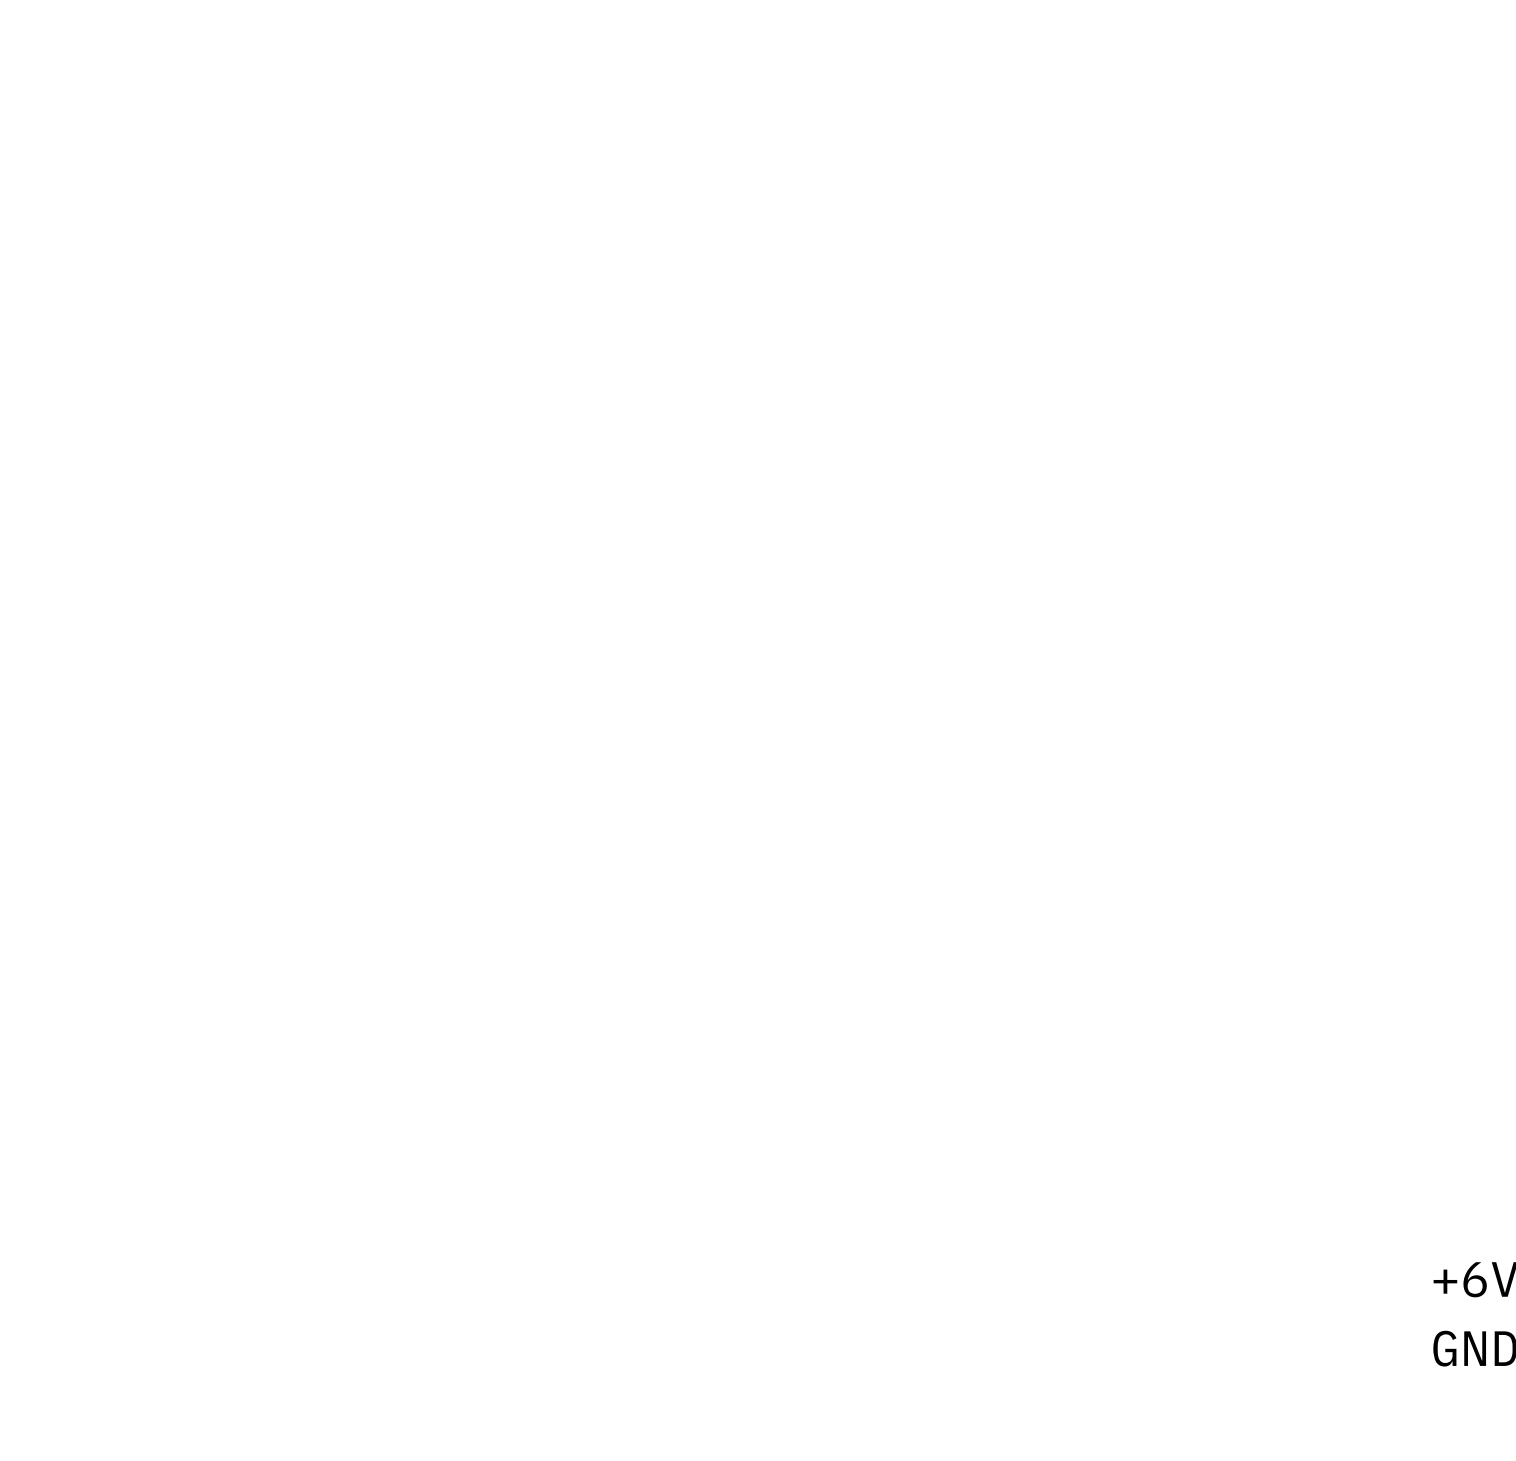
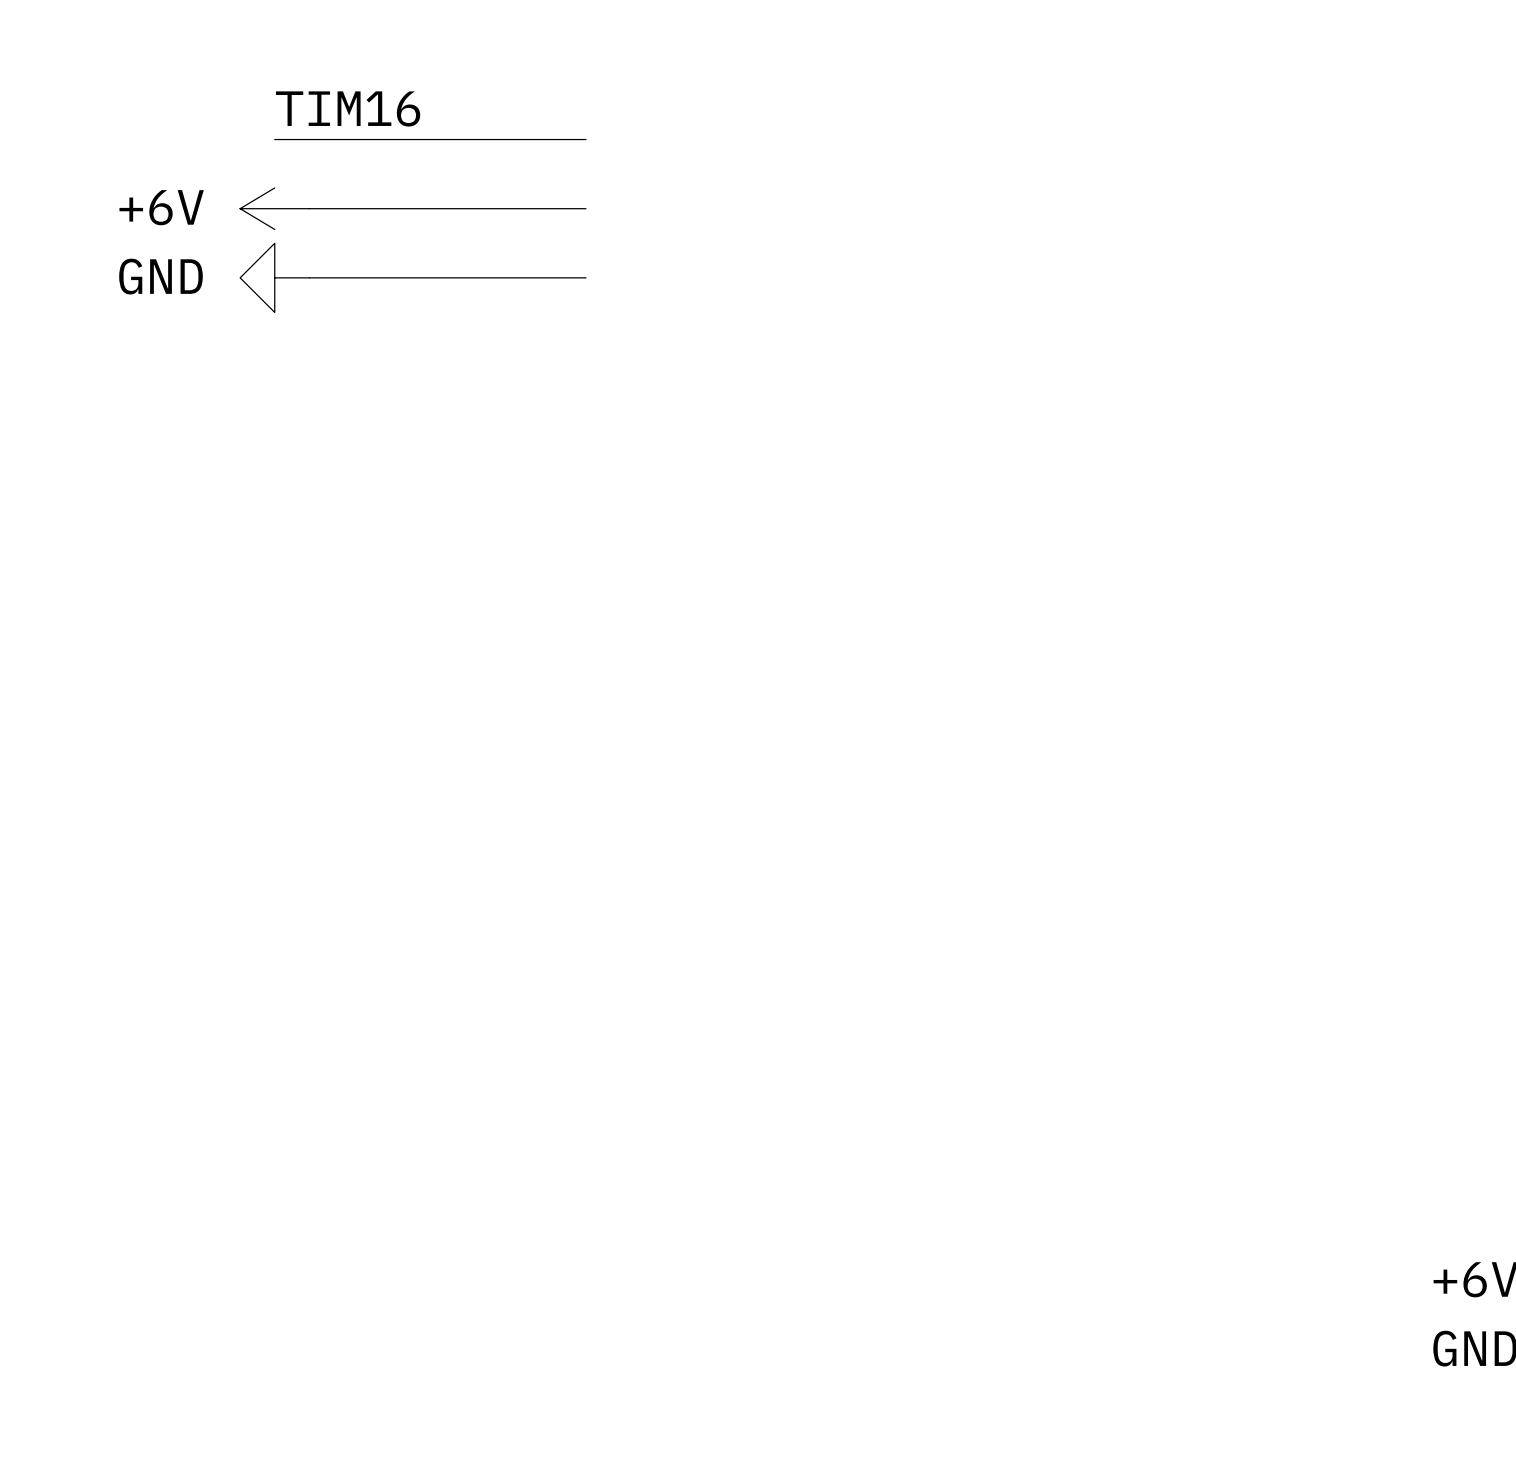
label: none -> TIM16 (348, 108)
wire: none -> (274, 139) (586, 139)
power symbol: none -> +6V (274, 208)
wire: none -> (309, 208) (586, 208)
power symbol: none -> GND (274, 277)
wire: none -> (309, 277) (586, 277)

